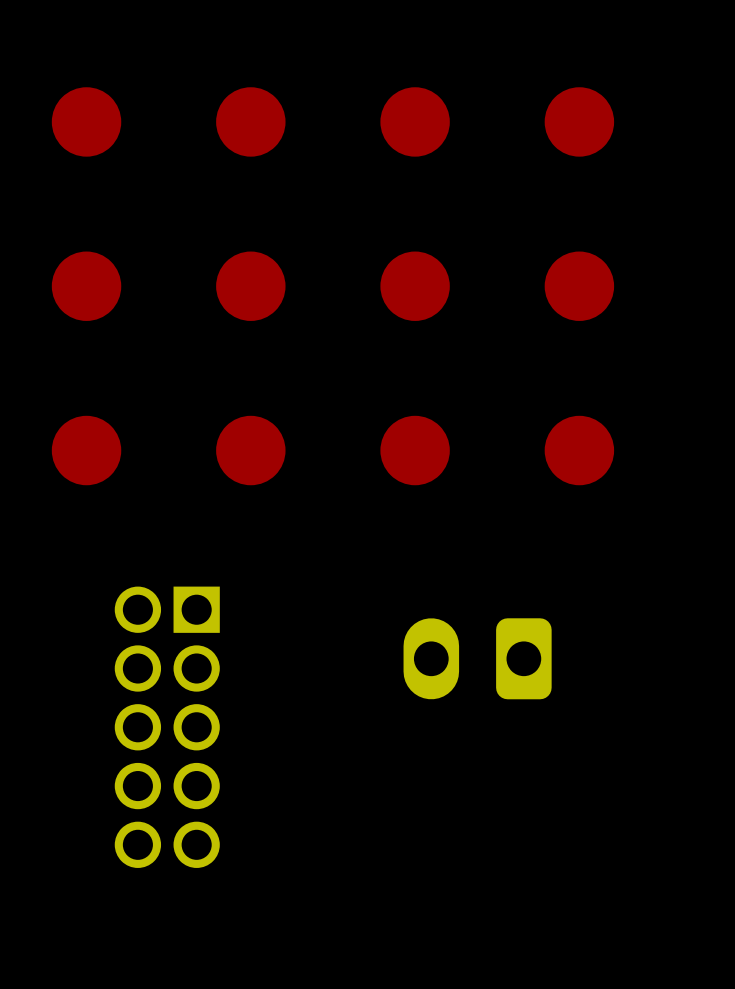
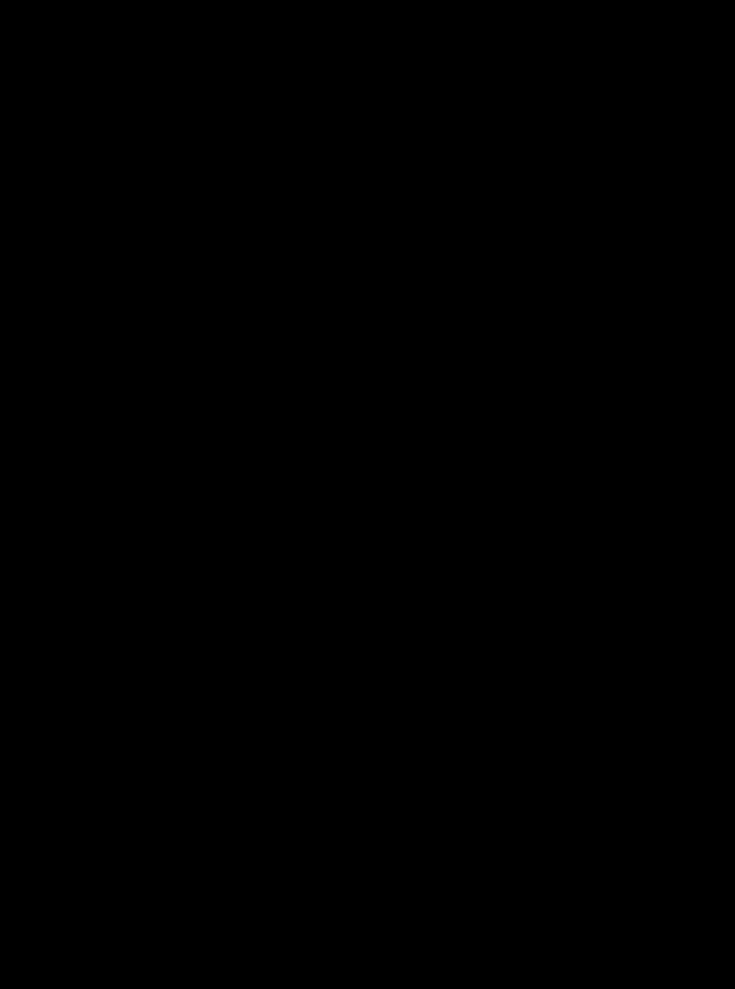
part: (86, 121) -> none
part: (250, 121) -> none
part: (415, 121) -> none
part: (579, 121) -> none
part: (86, 286) -> none
part: (250, 286) -> none
part: (415, 286) -> none
part: (579, 286) -> none
part: (86, 450) -> none
part: (250, 450) -> none
part: (415, 450) -> none
part: (579, 450) -> none
part: (477, 658) -> none
part: (167, 727) -> none

